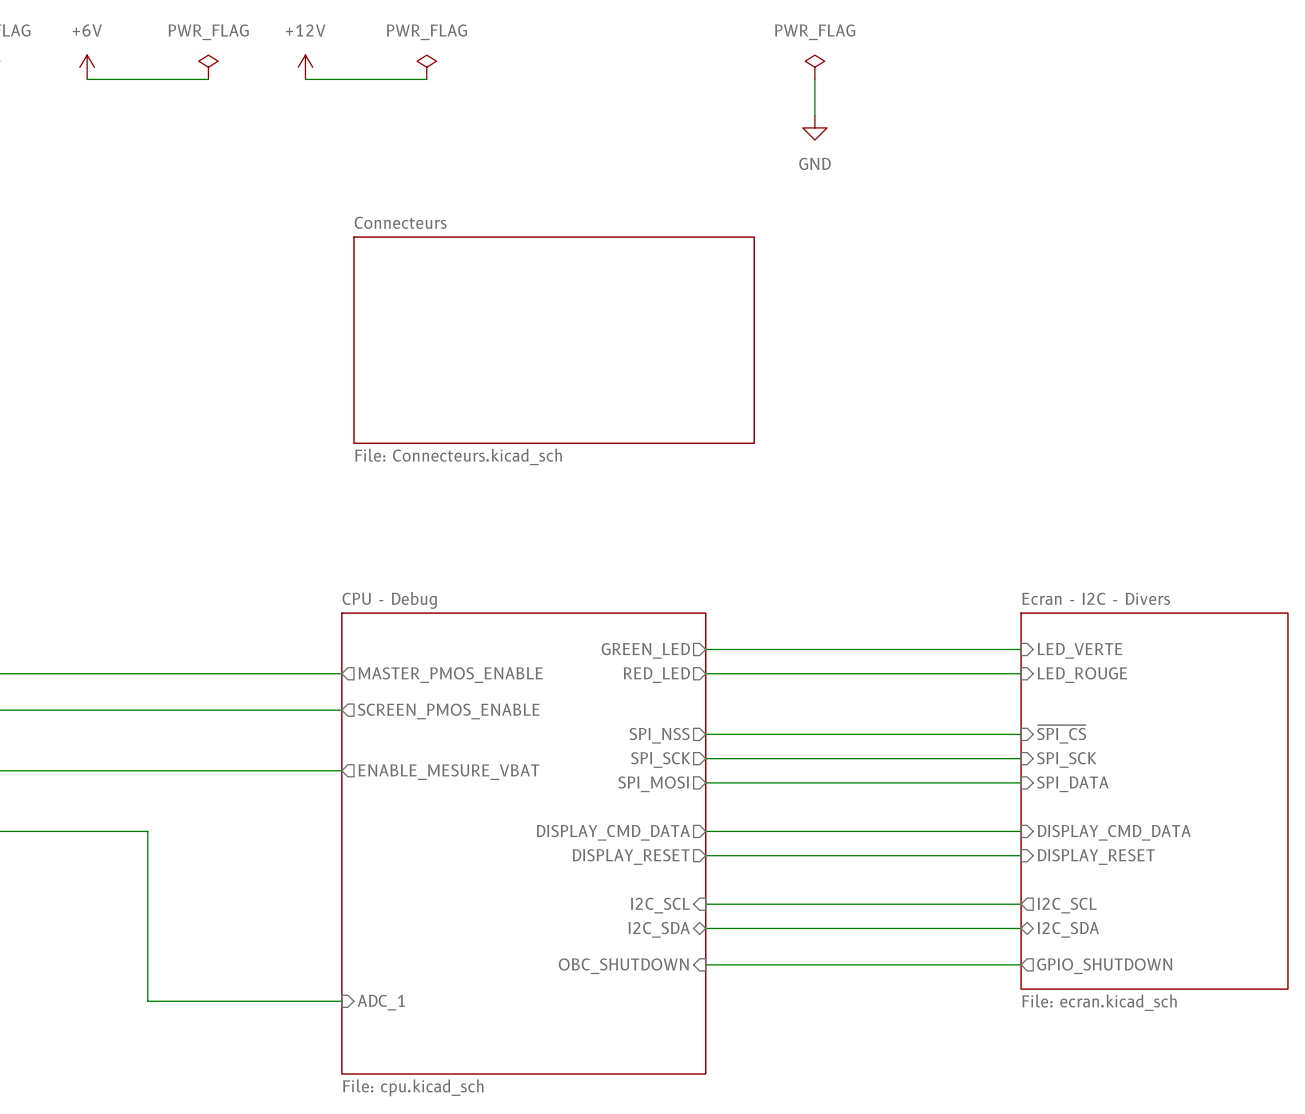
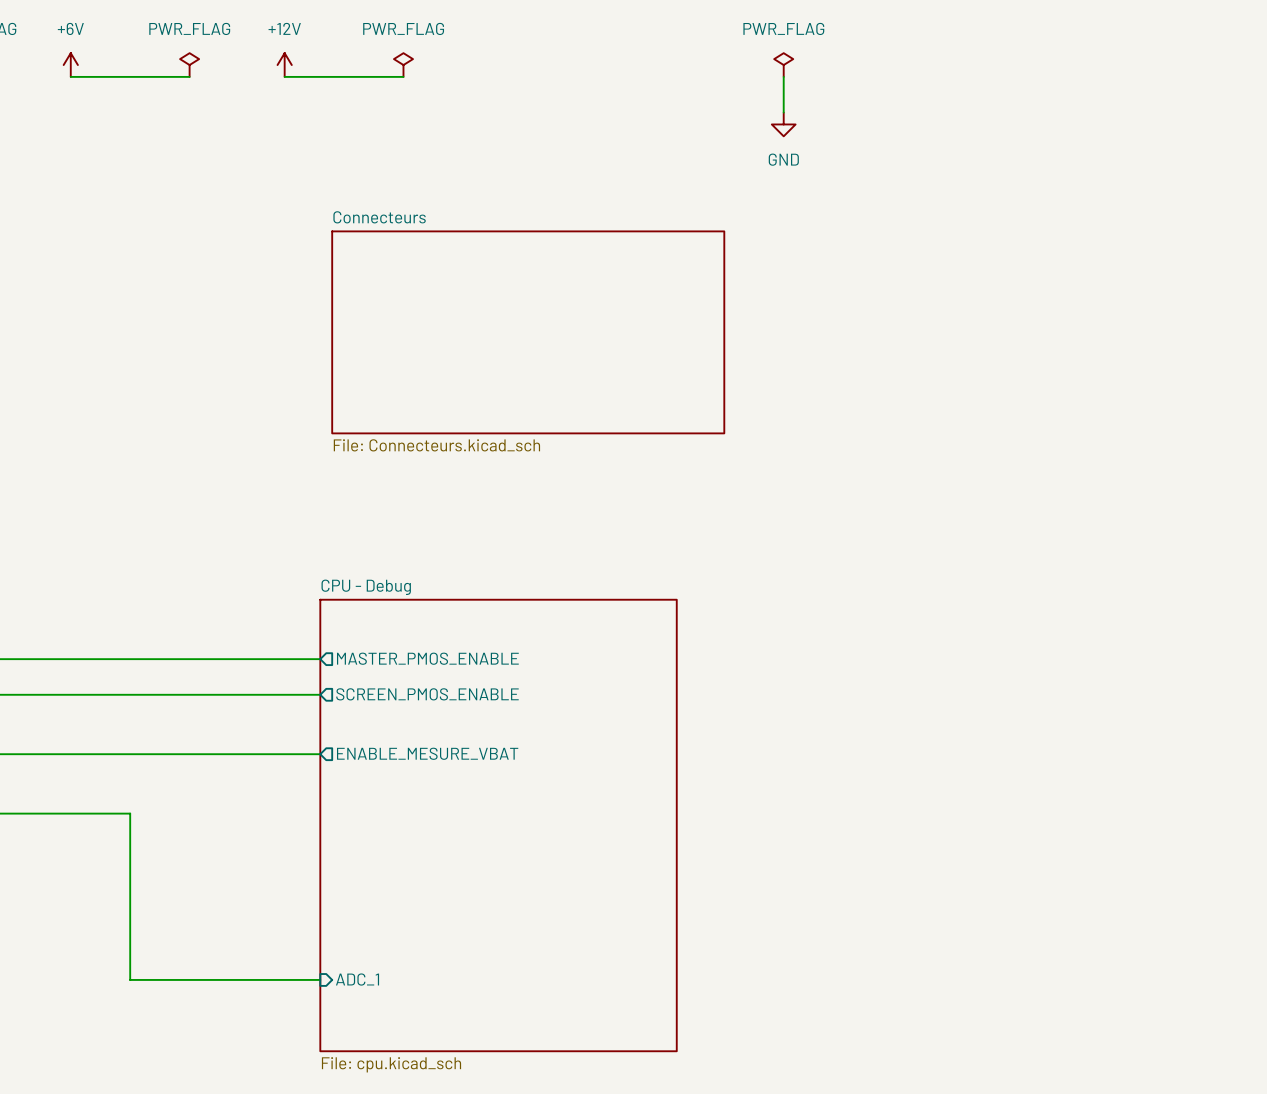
wire: (705, 649) (1021, 649) -> none
sheet pin: GREEN_LED (645, 650) -> none
sheet pin: LED_VERTE (1080, 650) -> none
wire: (705, 673) (1021, 673) -> none
sheet pin: RED_LED (656, 675) -> none
sheet pin: LED_ROUGE (1082, 675) -> none
wire: (705, 734) (1021, 734) -> none
sheet pin: ~{SPI_CS} (1061, 734) -> none
sheet pin: SPI_NSS (659, 735) -> none
wire: (705, 758) (1021, 758) -> none
sheet pin: SPI_SCK (660, 760) -> none
sheet pin: SPI_SCK (1066, 760) -> none
wire: (705, 782) (1021, 782) -> none
sheet pin: SPI_MOSI (653, 784) -> none
sheet pin: SPI_DATA (1072, 784) -> none
sheet Ecran - I2C - Divers: File: ecran.kicad_sch (1154, 801) -> none
wire: (705, 831) (1021, 831) -> none
sheet pin: DISPLAY_CMD_DATA (613, 832) -> none
sheet pin: DISPLAY_CMD_DATA (1114, 832) -> none
wire: (705, 855) (1021, 855) -> none
sheet pin: DISPLAY_RESET (631, 857) -> none
sheet pin: DISPLAY_RESET (1096, 857) -> none
wire: (705, 904) (1021, 904) -> none
sheet pin: I2C_SCL (660, 905) -> none
sheet pin: I2C_SCL (1067, 905) -> none
wire: (705, 928) (1021, 928) -> none
sheet pin: I2C_SDA (659, 929) -> none
sheet pin: I2C_SDA (1068, 929) -> none
wire: (705, 964) (1021, 964) -> none
sheet pin: OBC_SHUTDOWN (623, 966) -> none
sheet pin: GPIO_SHUTDOWN (1104, 966) -> none

